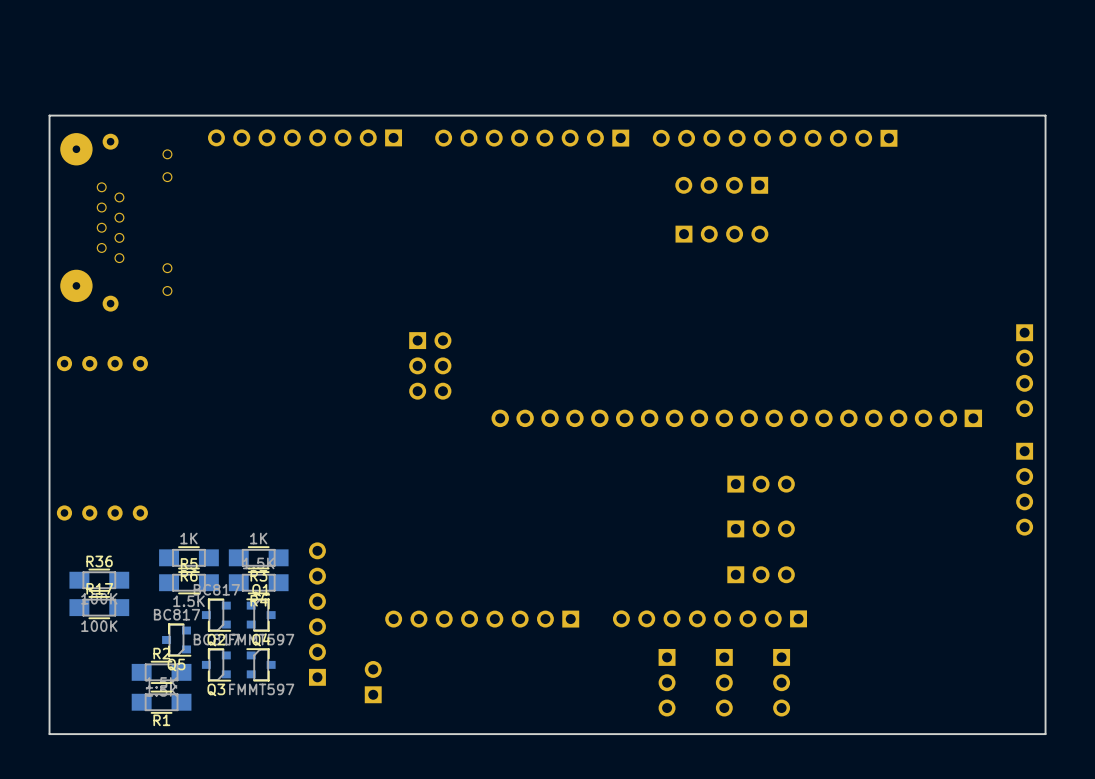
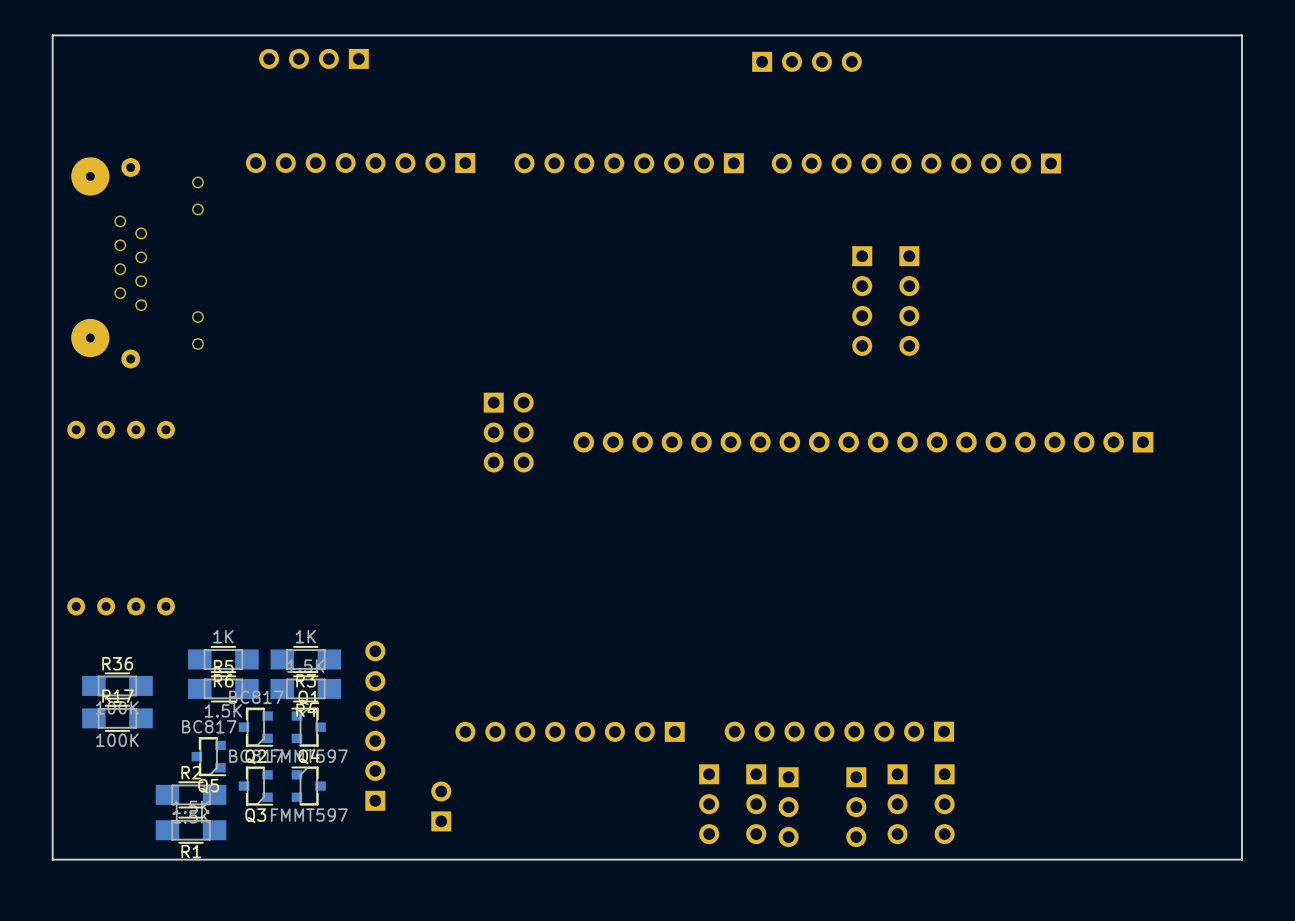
part: none -> (313, 58)
part: none -> (806, 61)
board edge: (1045, 115) (49, 115) (49, 734) (1045, 734) (1045, 115) -> (1241, 35) (1241, 859) (52, 859) (52, 35) (1241, 35)
part: (721, 185) -> none
part rotation: 0° (721, 234) -> 90° clockwise (862, 301)
part: none -> (909, 301)
part: (1024, 370) -> none
part position: (736, 418) -> (863, 442)
part: (761, 484) -> none
part: (1024, 489) -> none
part: (761, 528) -> none
part: (761, 574) -> none
part: none -> (709, 804)
part: none -> (756, 804)
part: none -> (897, 804)
part: none -> (944, 804)
part: (781, 682) -> none

